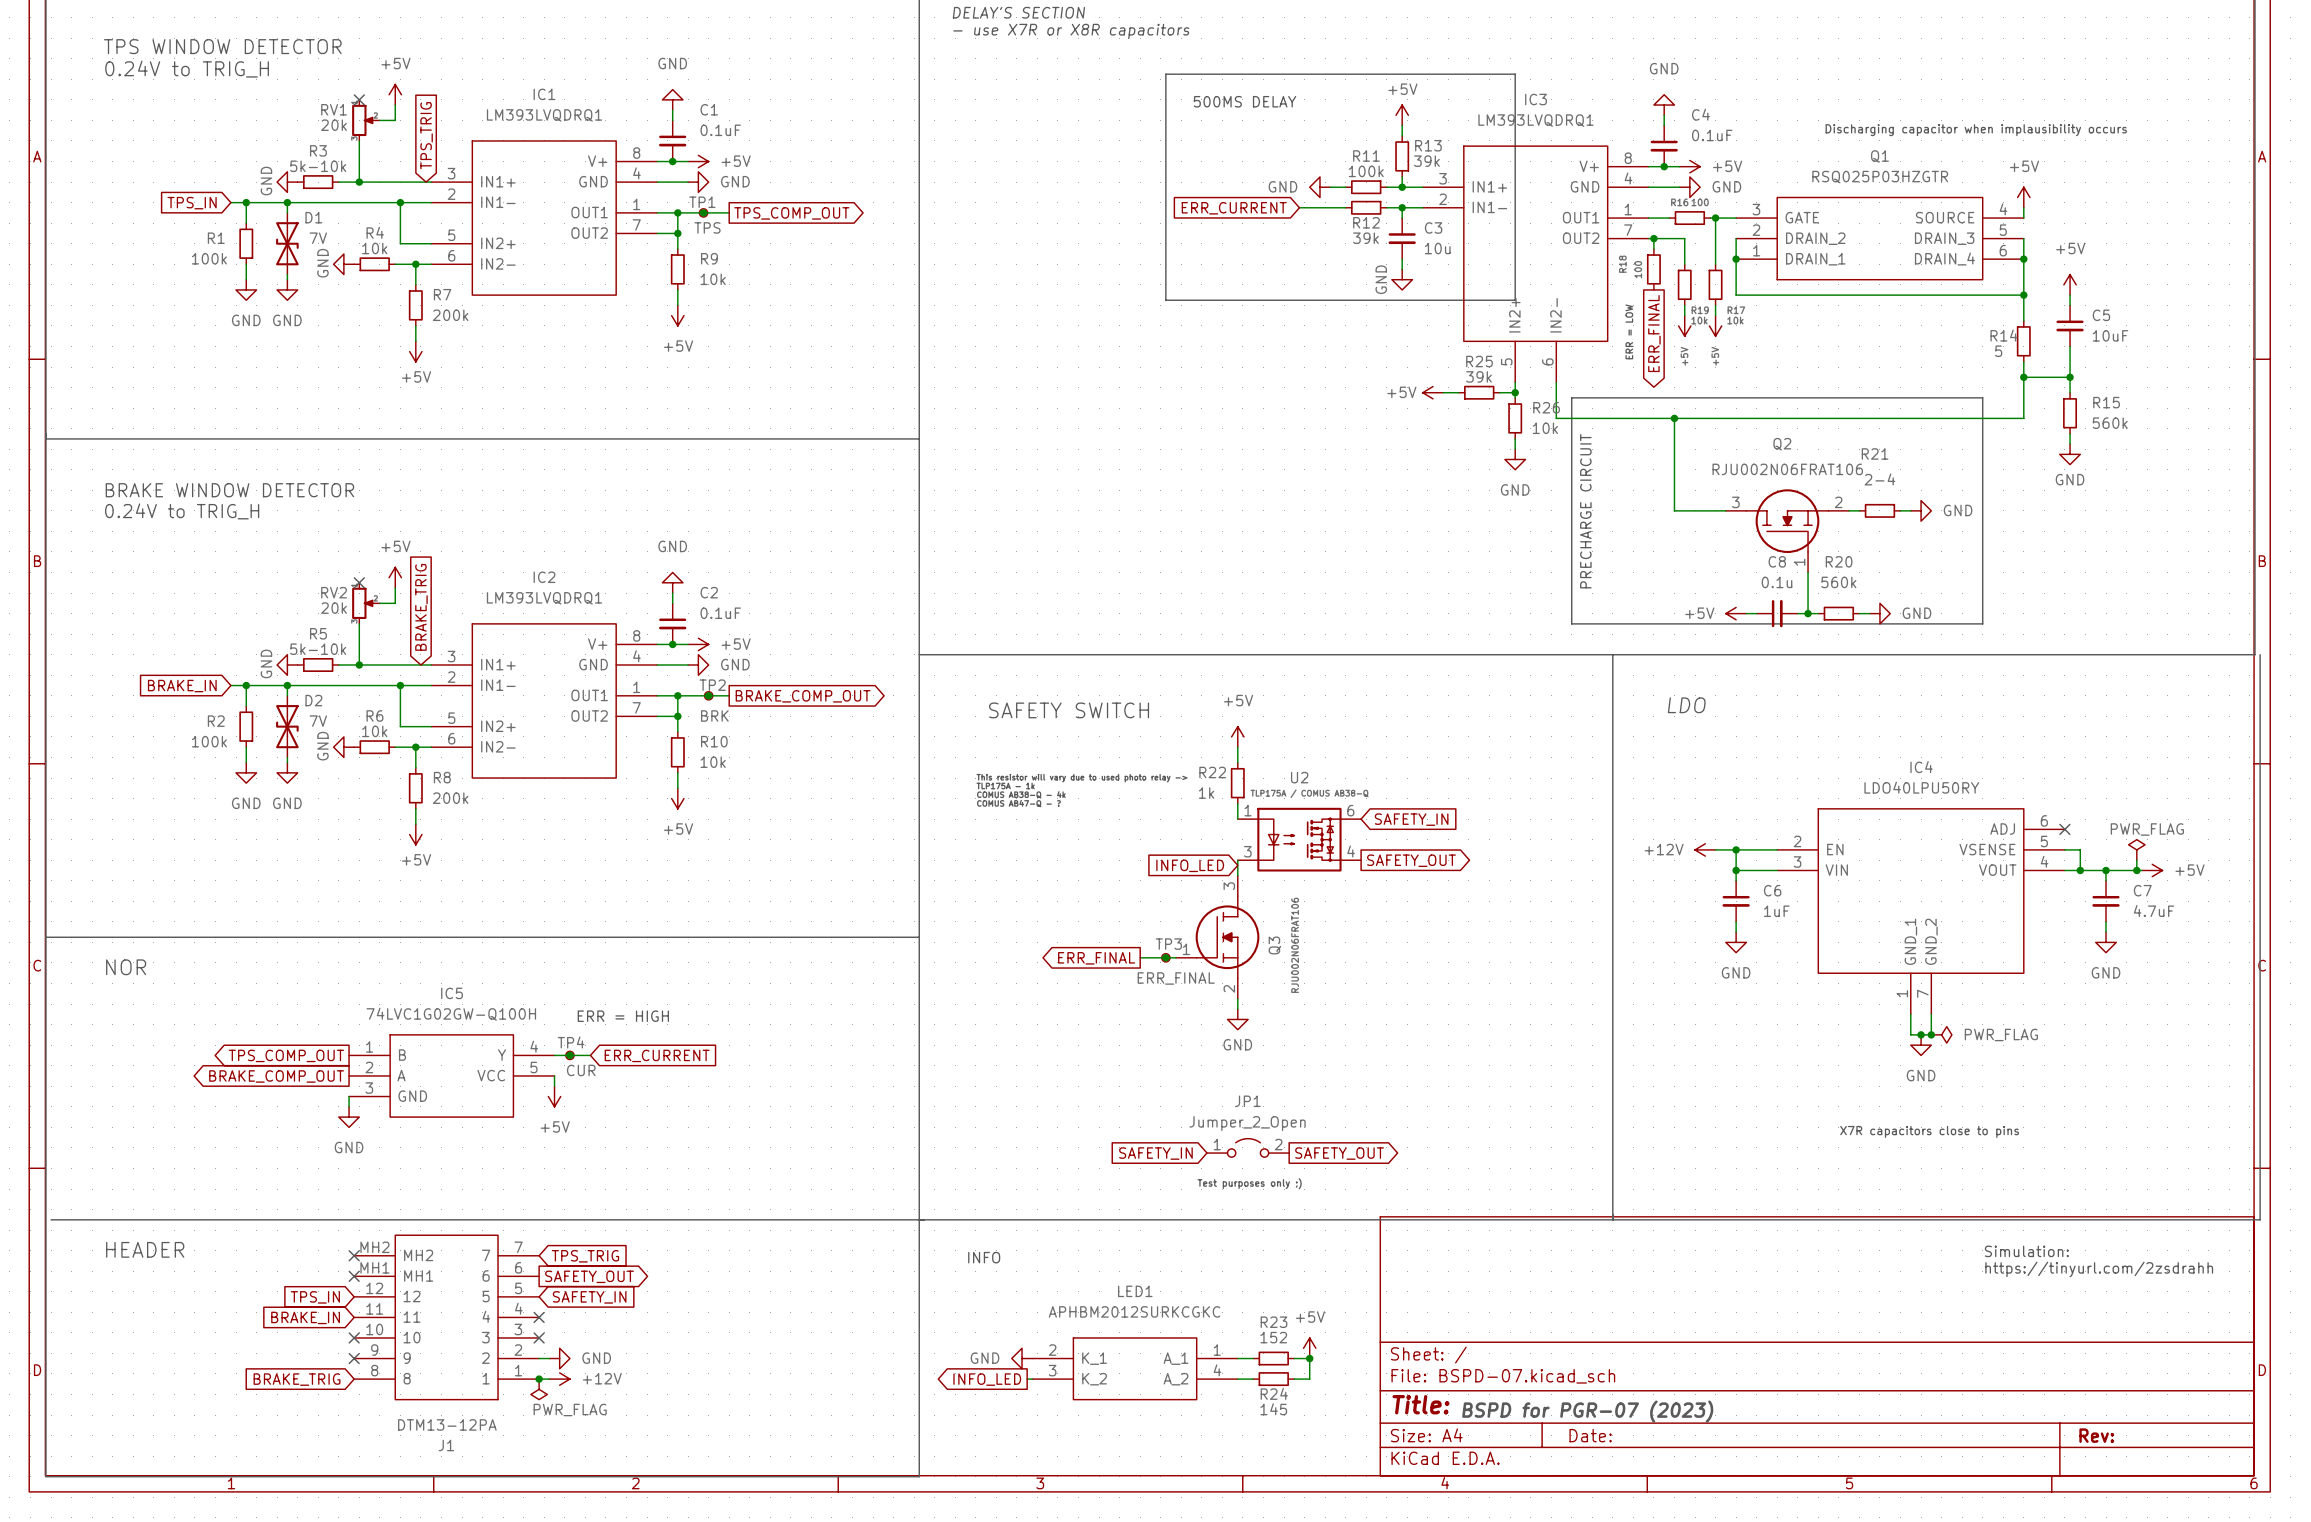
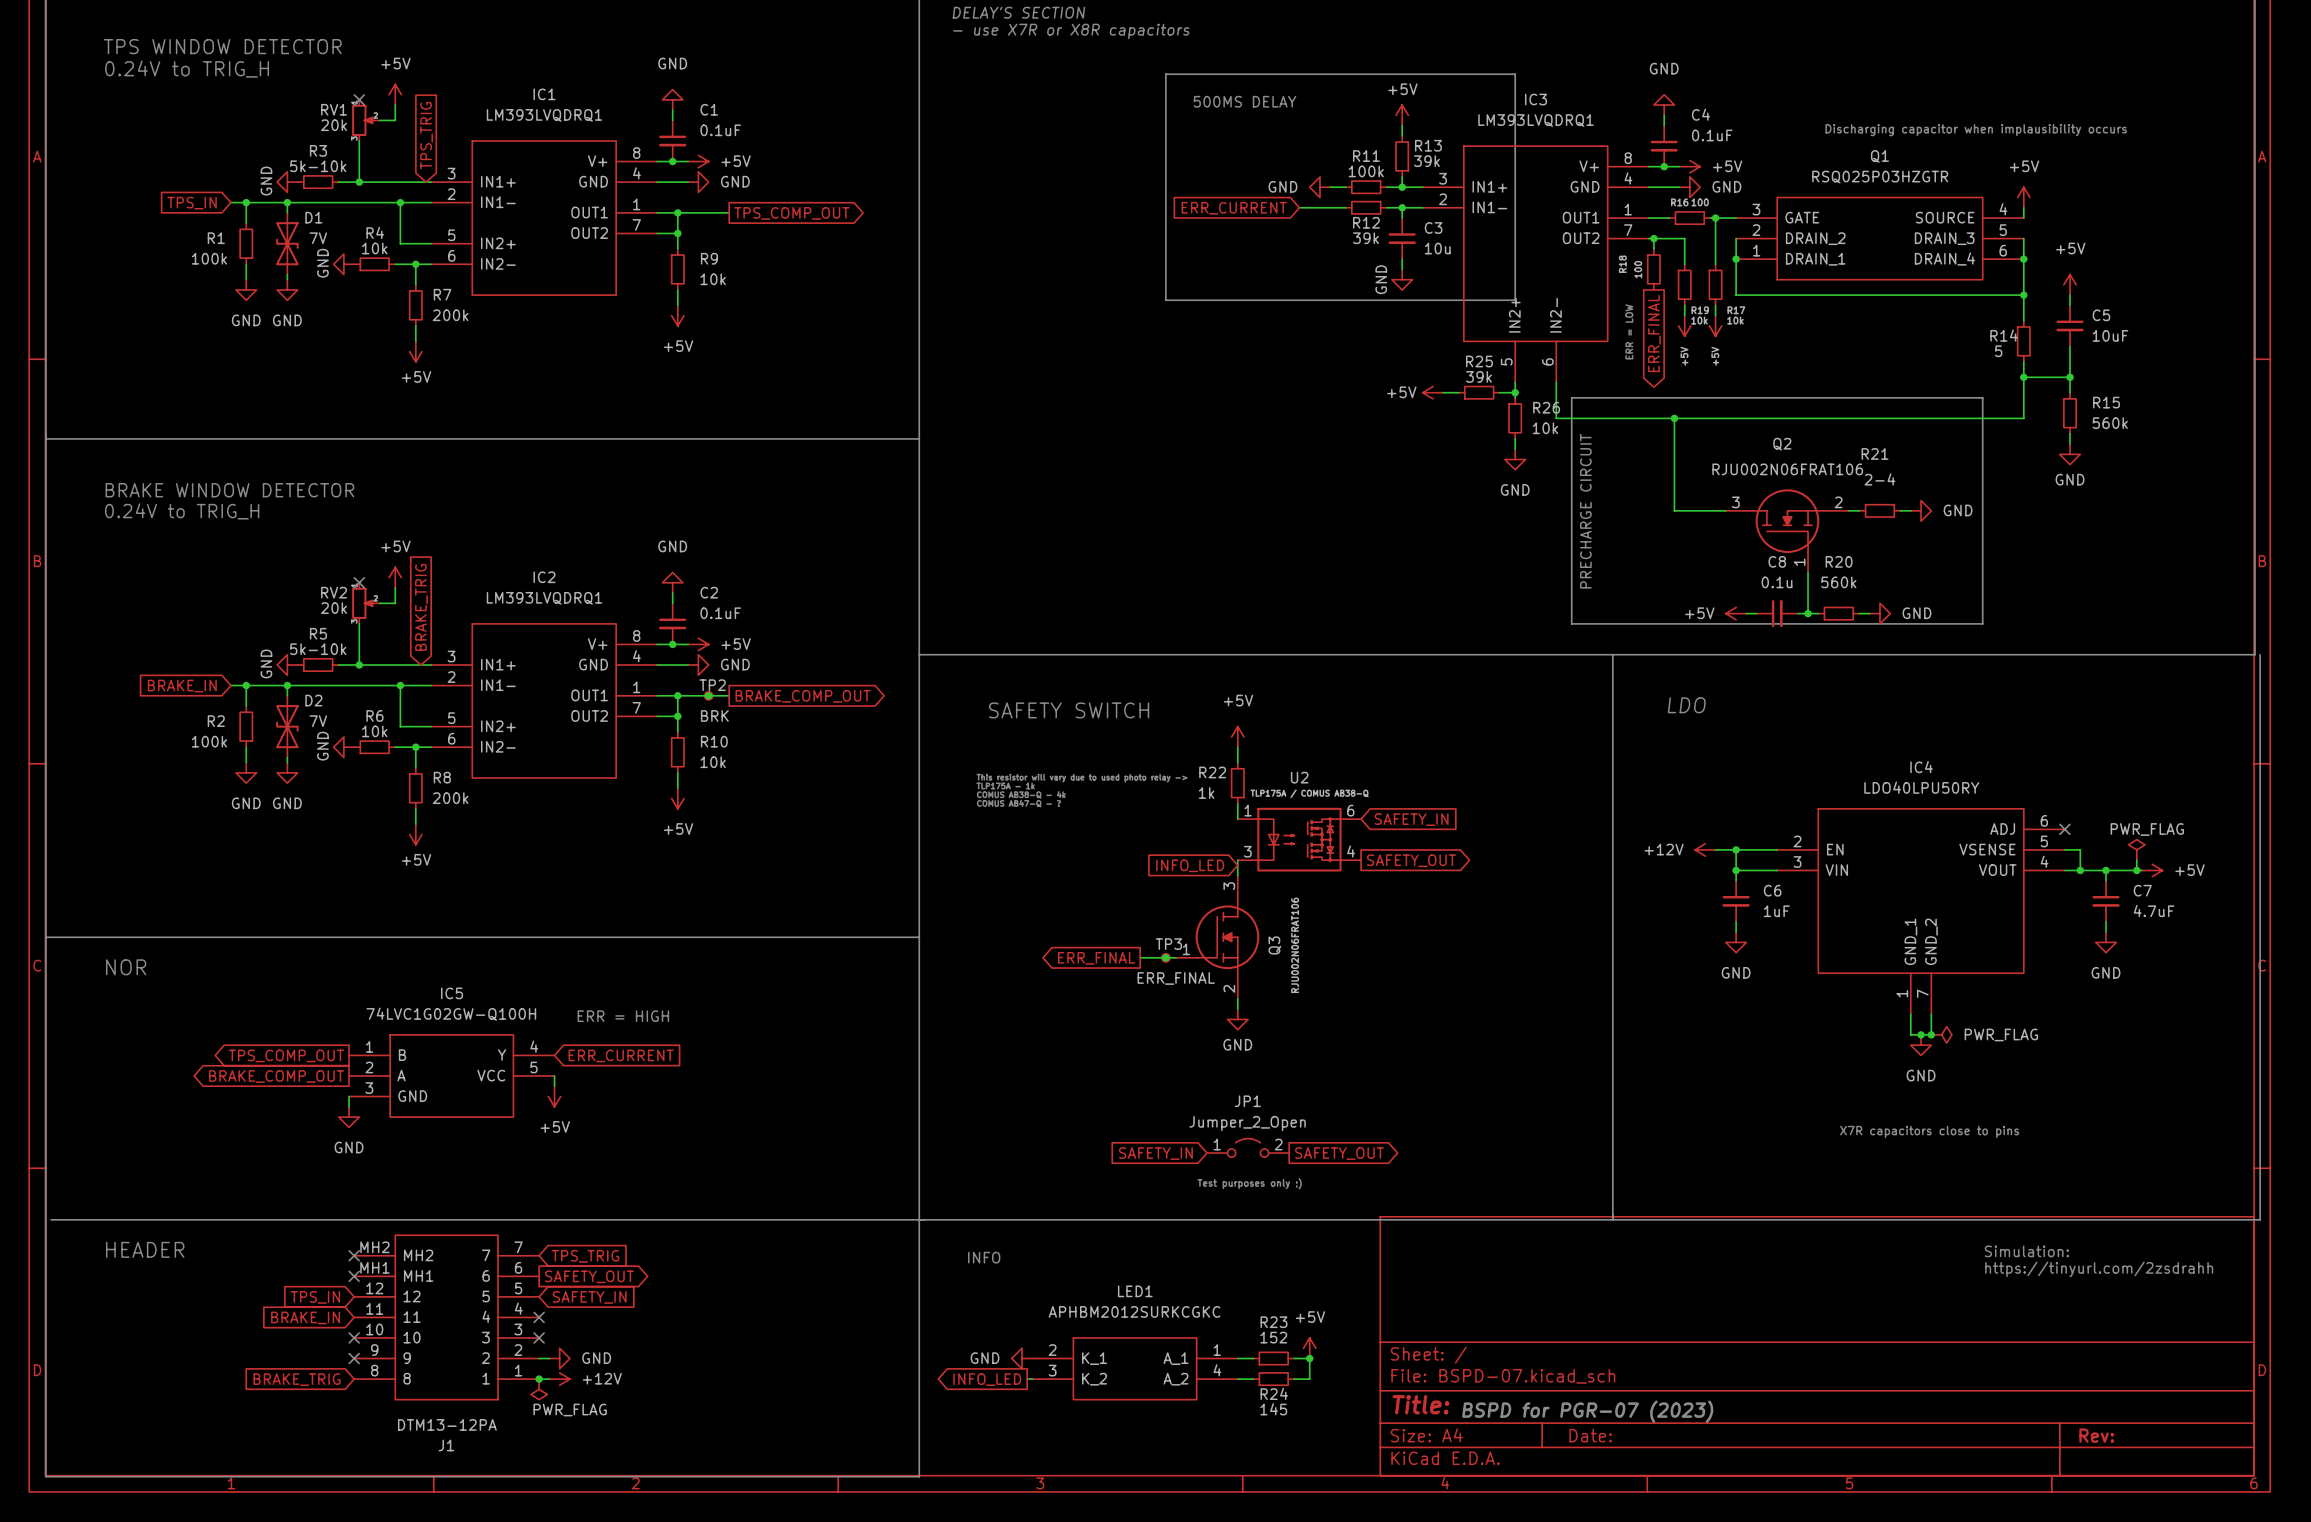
junction: (703, 212) -> none
TP1: TPS (703, 212) -> none
wire: (554, 1055) (590, 1055) -> none
junction: (569, 1055) -> none
TP4: CUR (569, 1055) -> none
global label position: ERR_CURRENT (657, 1055) -> ERR_CURRENT (621, 1055)

